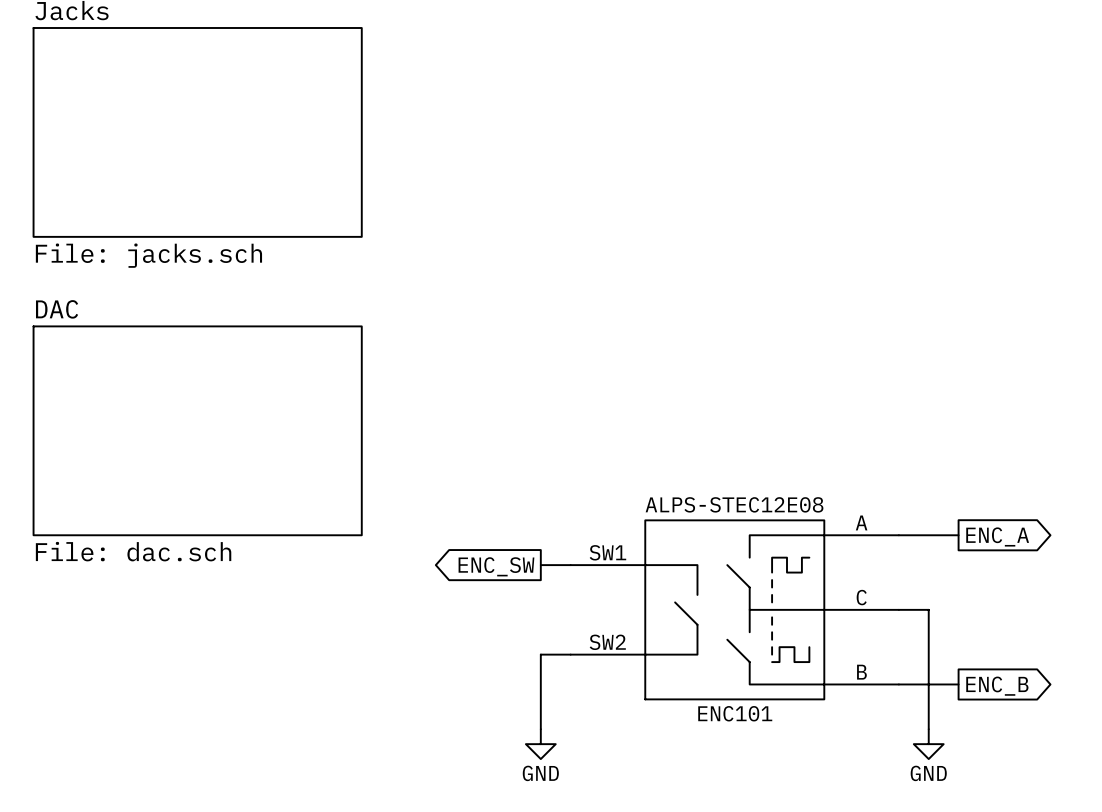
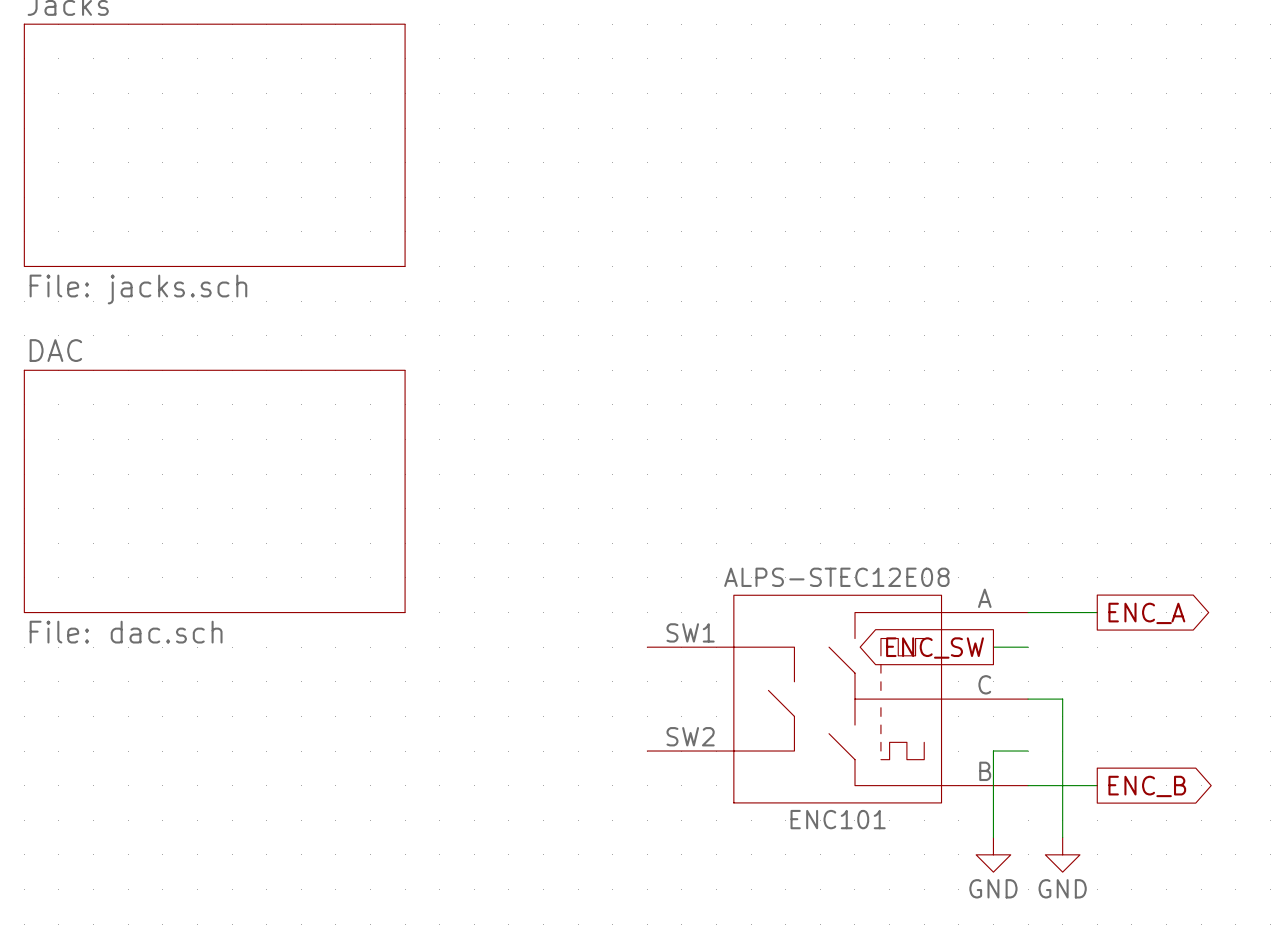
wire: (540, 565) (570, 565) -> none
wire: none -> (993, 647) (1028, 647)
global label: ENC_SW (496, 566) -> none
global label: none -> ENC_SW (935, 648)
wire: (570, 654) (540, 654) (540, 729) -> none
wire: none -> (1028, 751) (993, 751) (993, 837)
power symbol: GND (540, 744) -> none
power symbol: none -> GND (993, 854)

